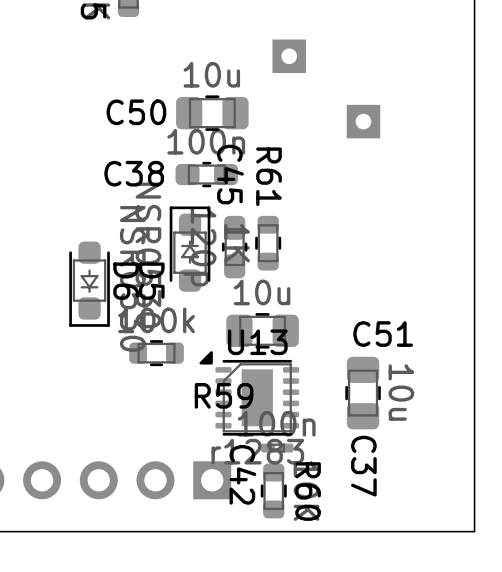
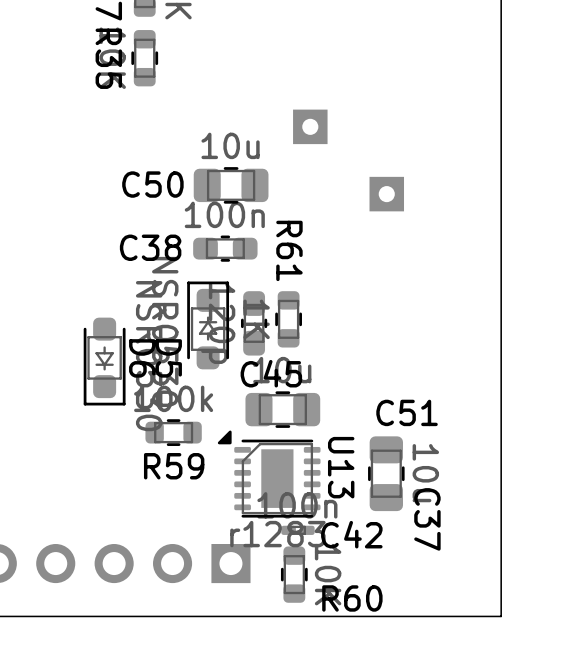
C45 name rotation: 0° (230, 174) -> 90° counterclockwise (271, 373)
C45 name position: C45 (230, 174) -> C45 (271, 373)
U13 name rotation: 0° (257, 342) -> 90° clockwise (341, 467)
R59 name position: R59 (224, 395) -> R59 (174, 466)
C37 name position: C37 (363, 466) -> C37 (427, 519)
C42 name rotation: 0° (242, 474) -> 90° counterclockwise (351, 534)
C42 name position: C42 (242, 474) -> C42 (351, 534)
R60 name rotation: 0° (308, 491) -> 90° counterclockwise (352, 598)

